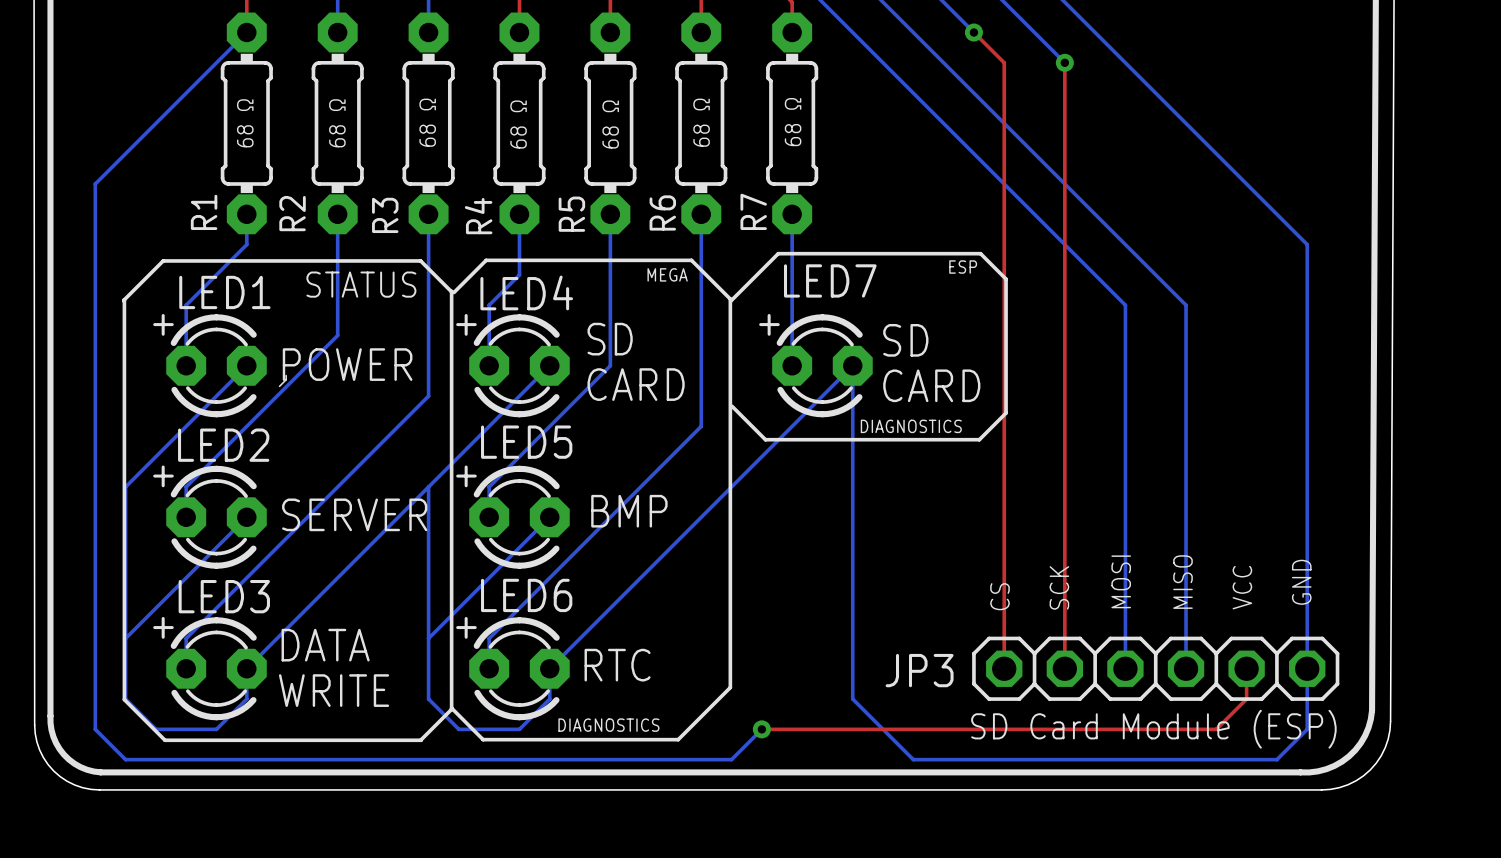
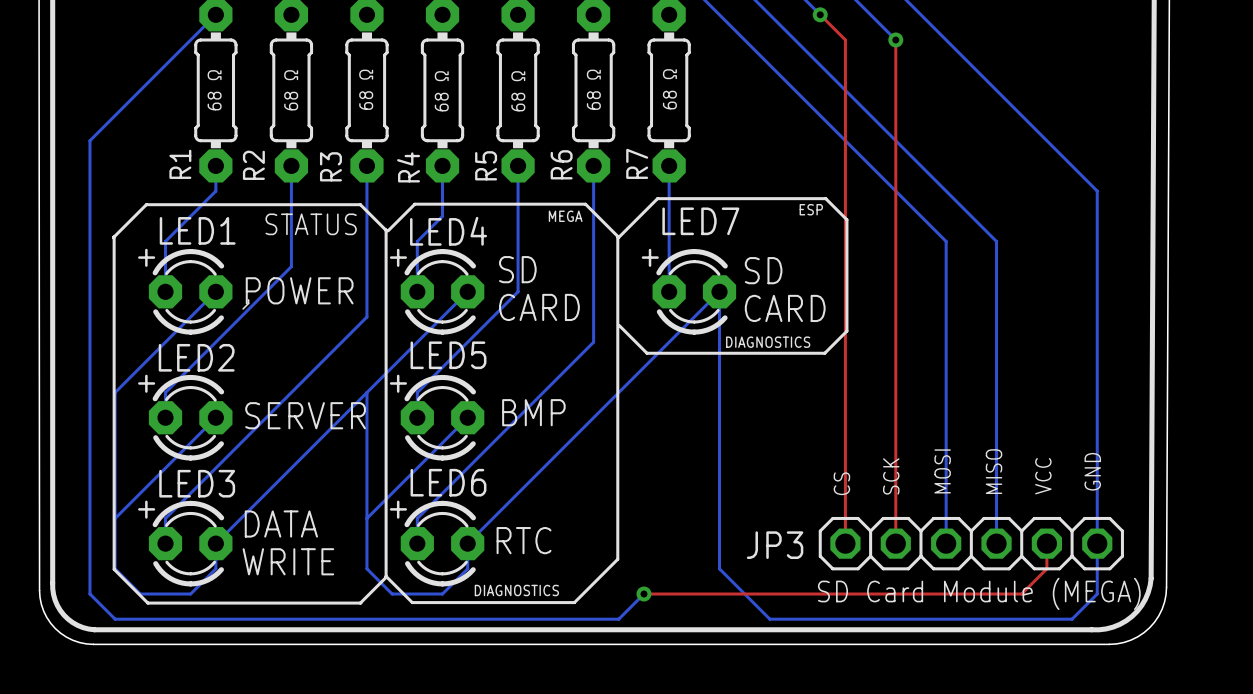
text: SD Card Module (ESP) (1153, 729) -> SD Card Module (MEGA) (979, 593)

